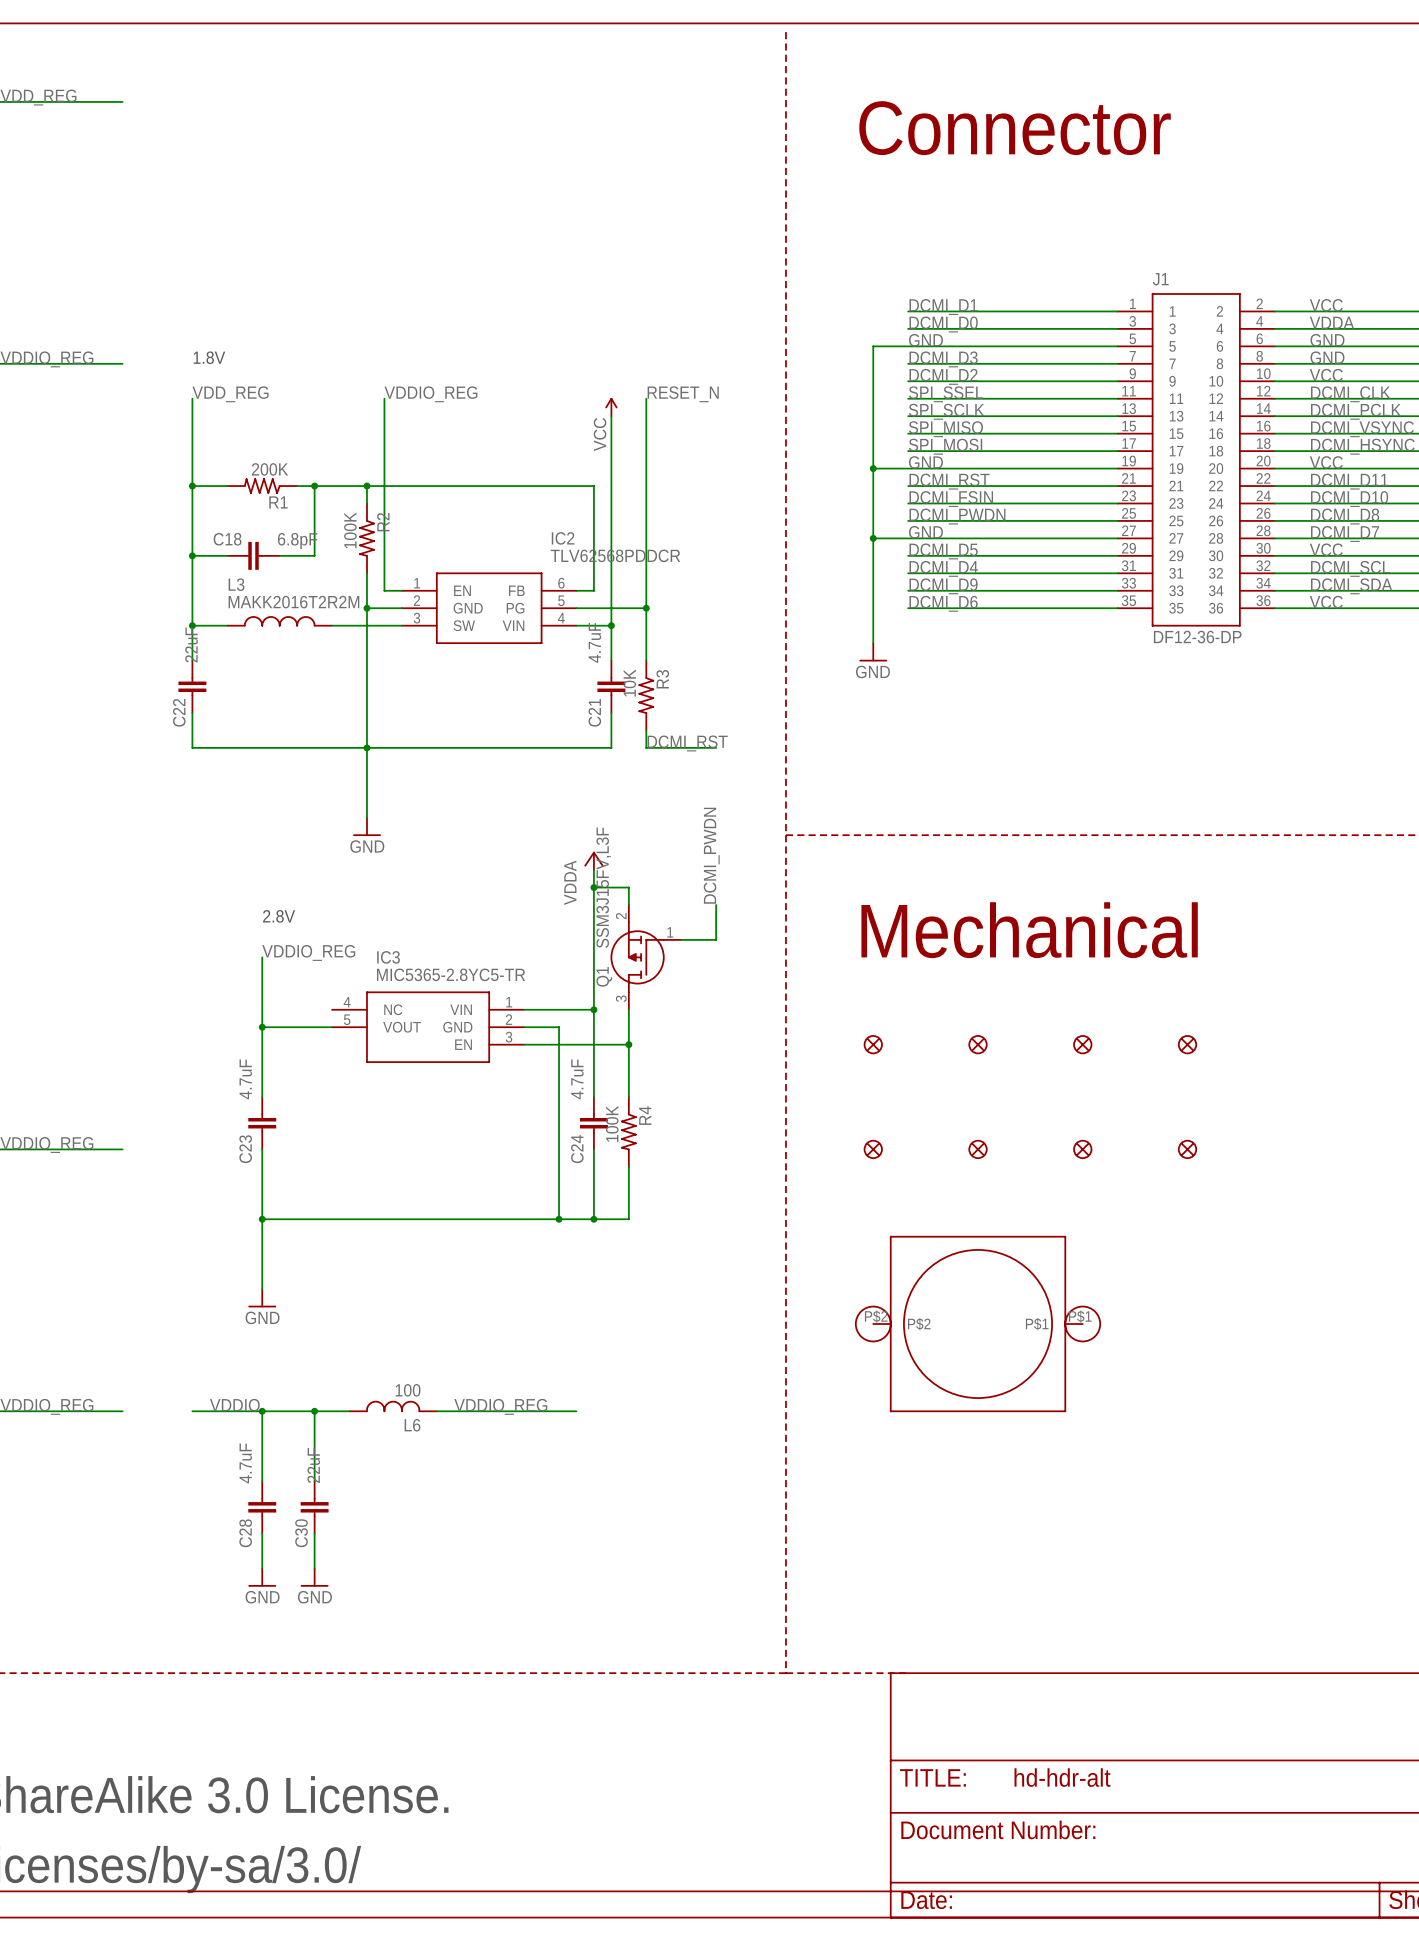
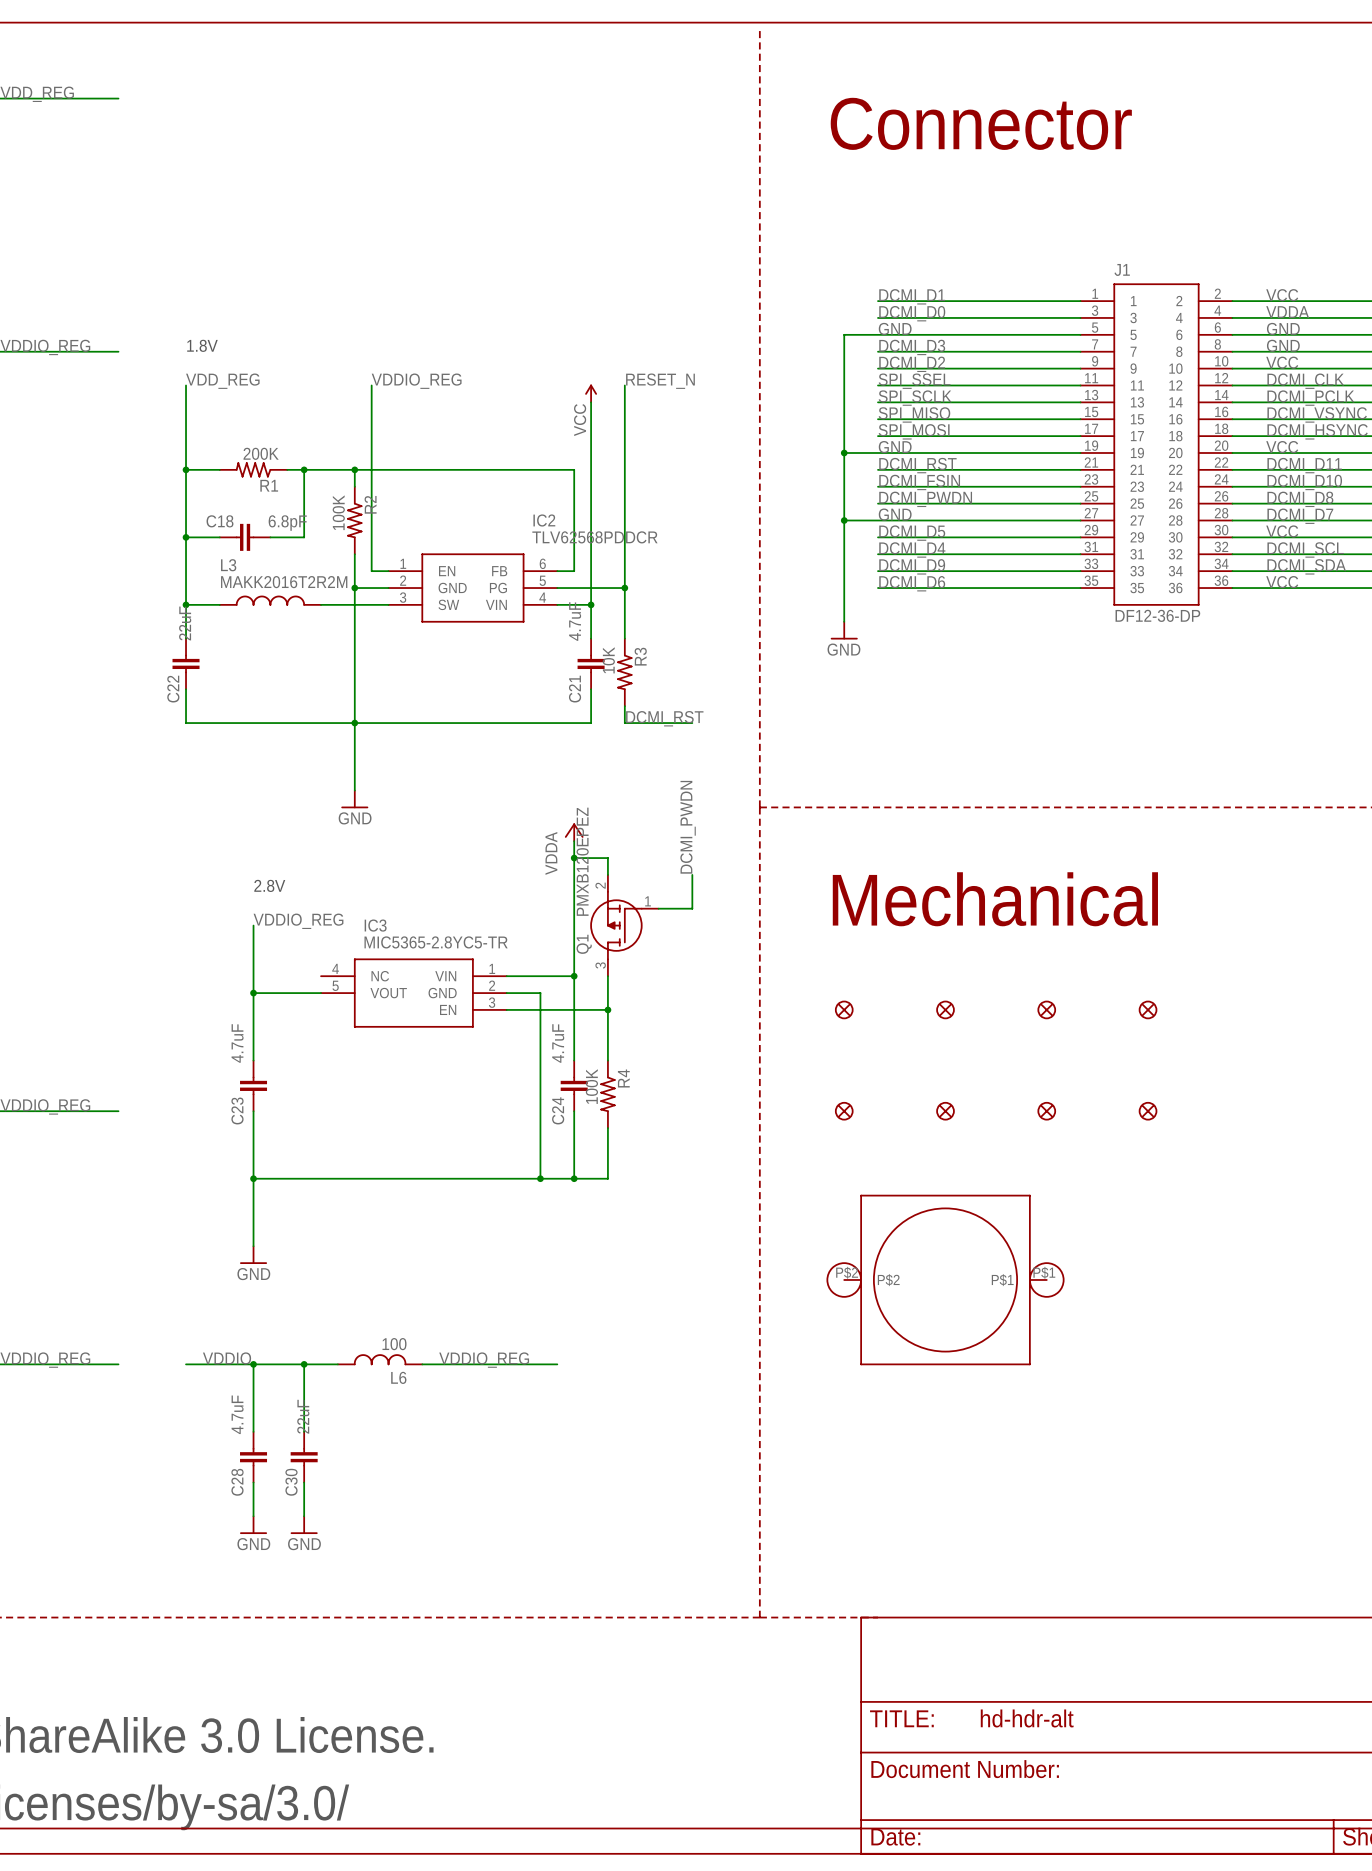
Q1 value: SSM3J15FV,L3F (603, 887) -> PMXB120EPEZ (582, 861)

